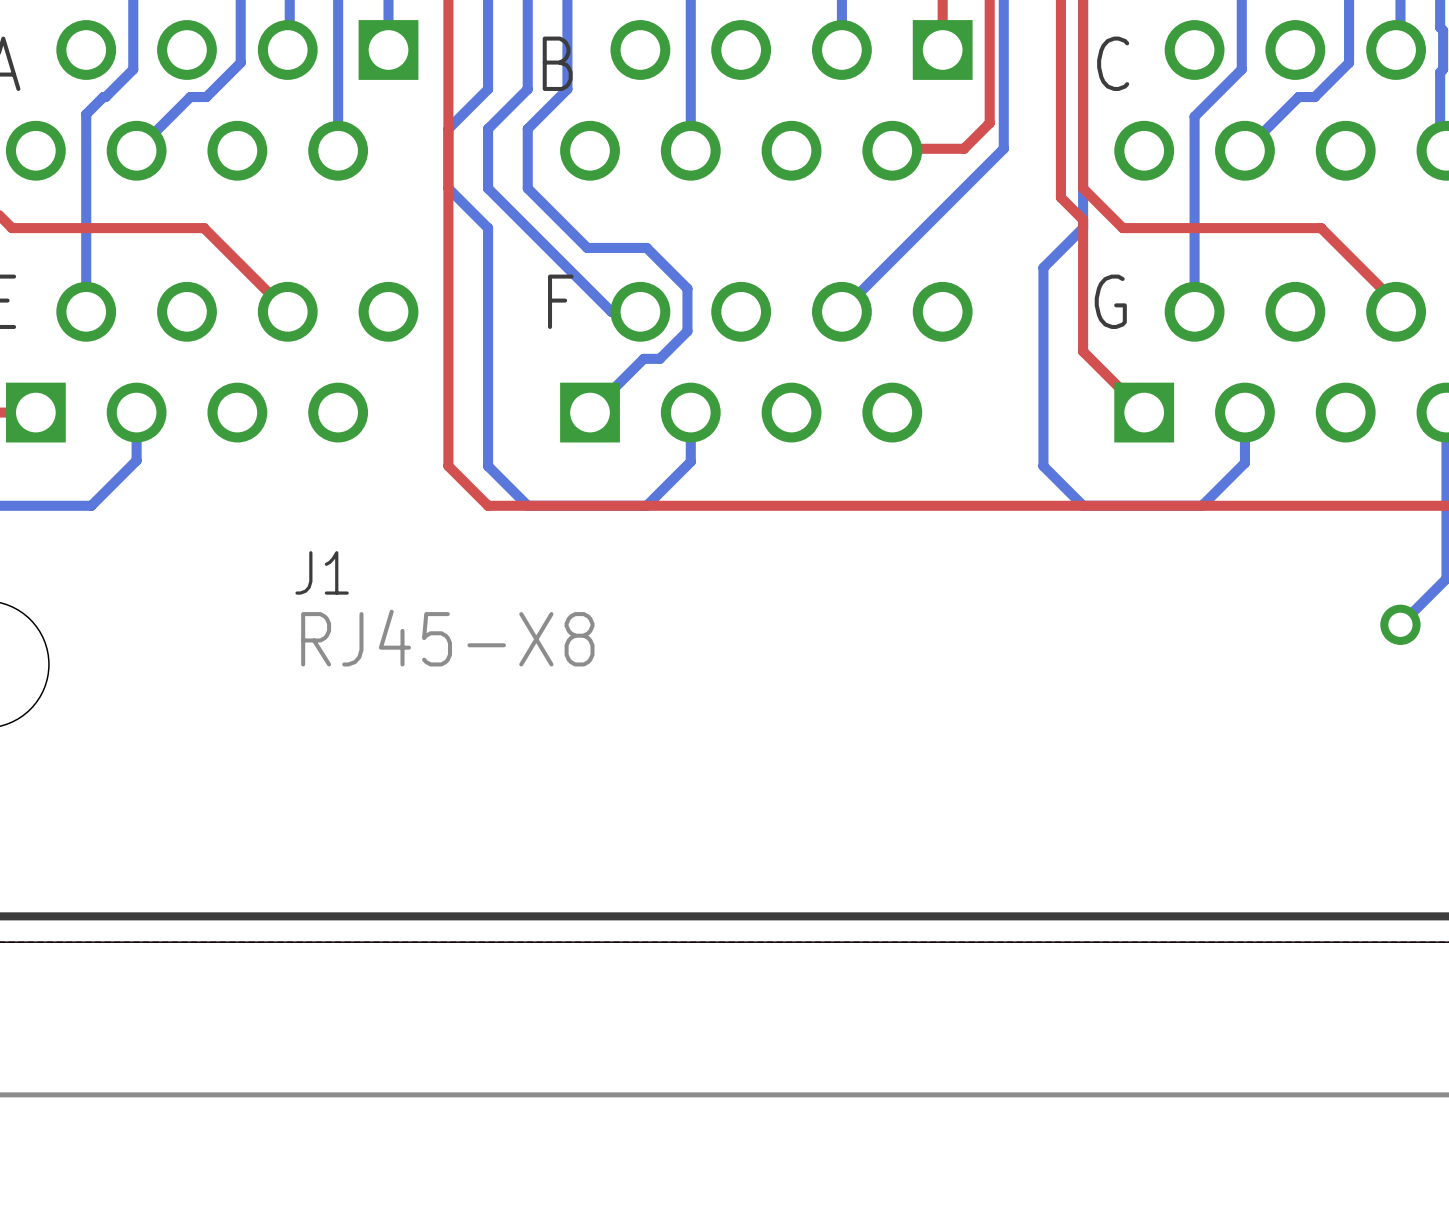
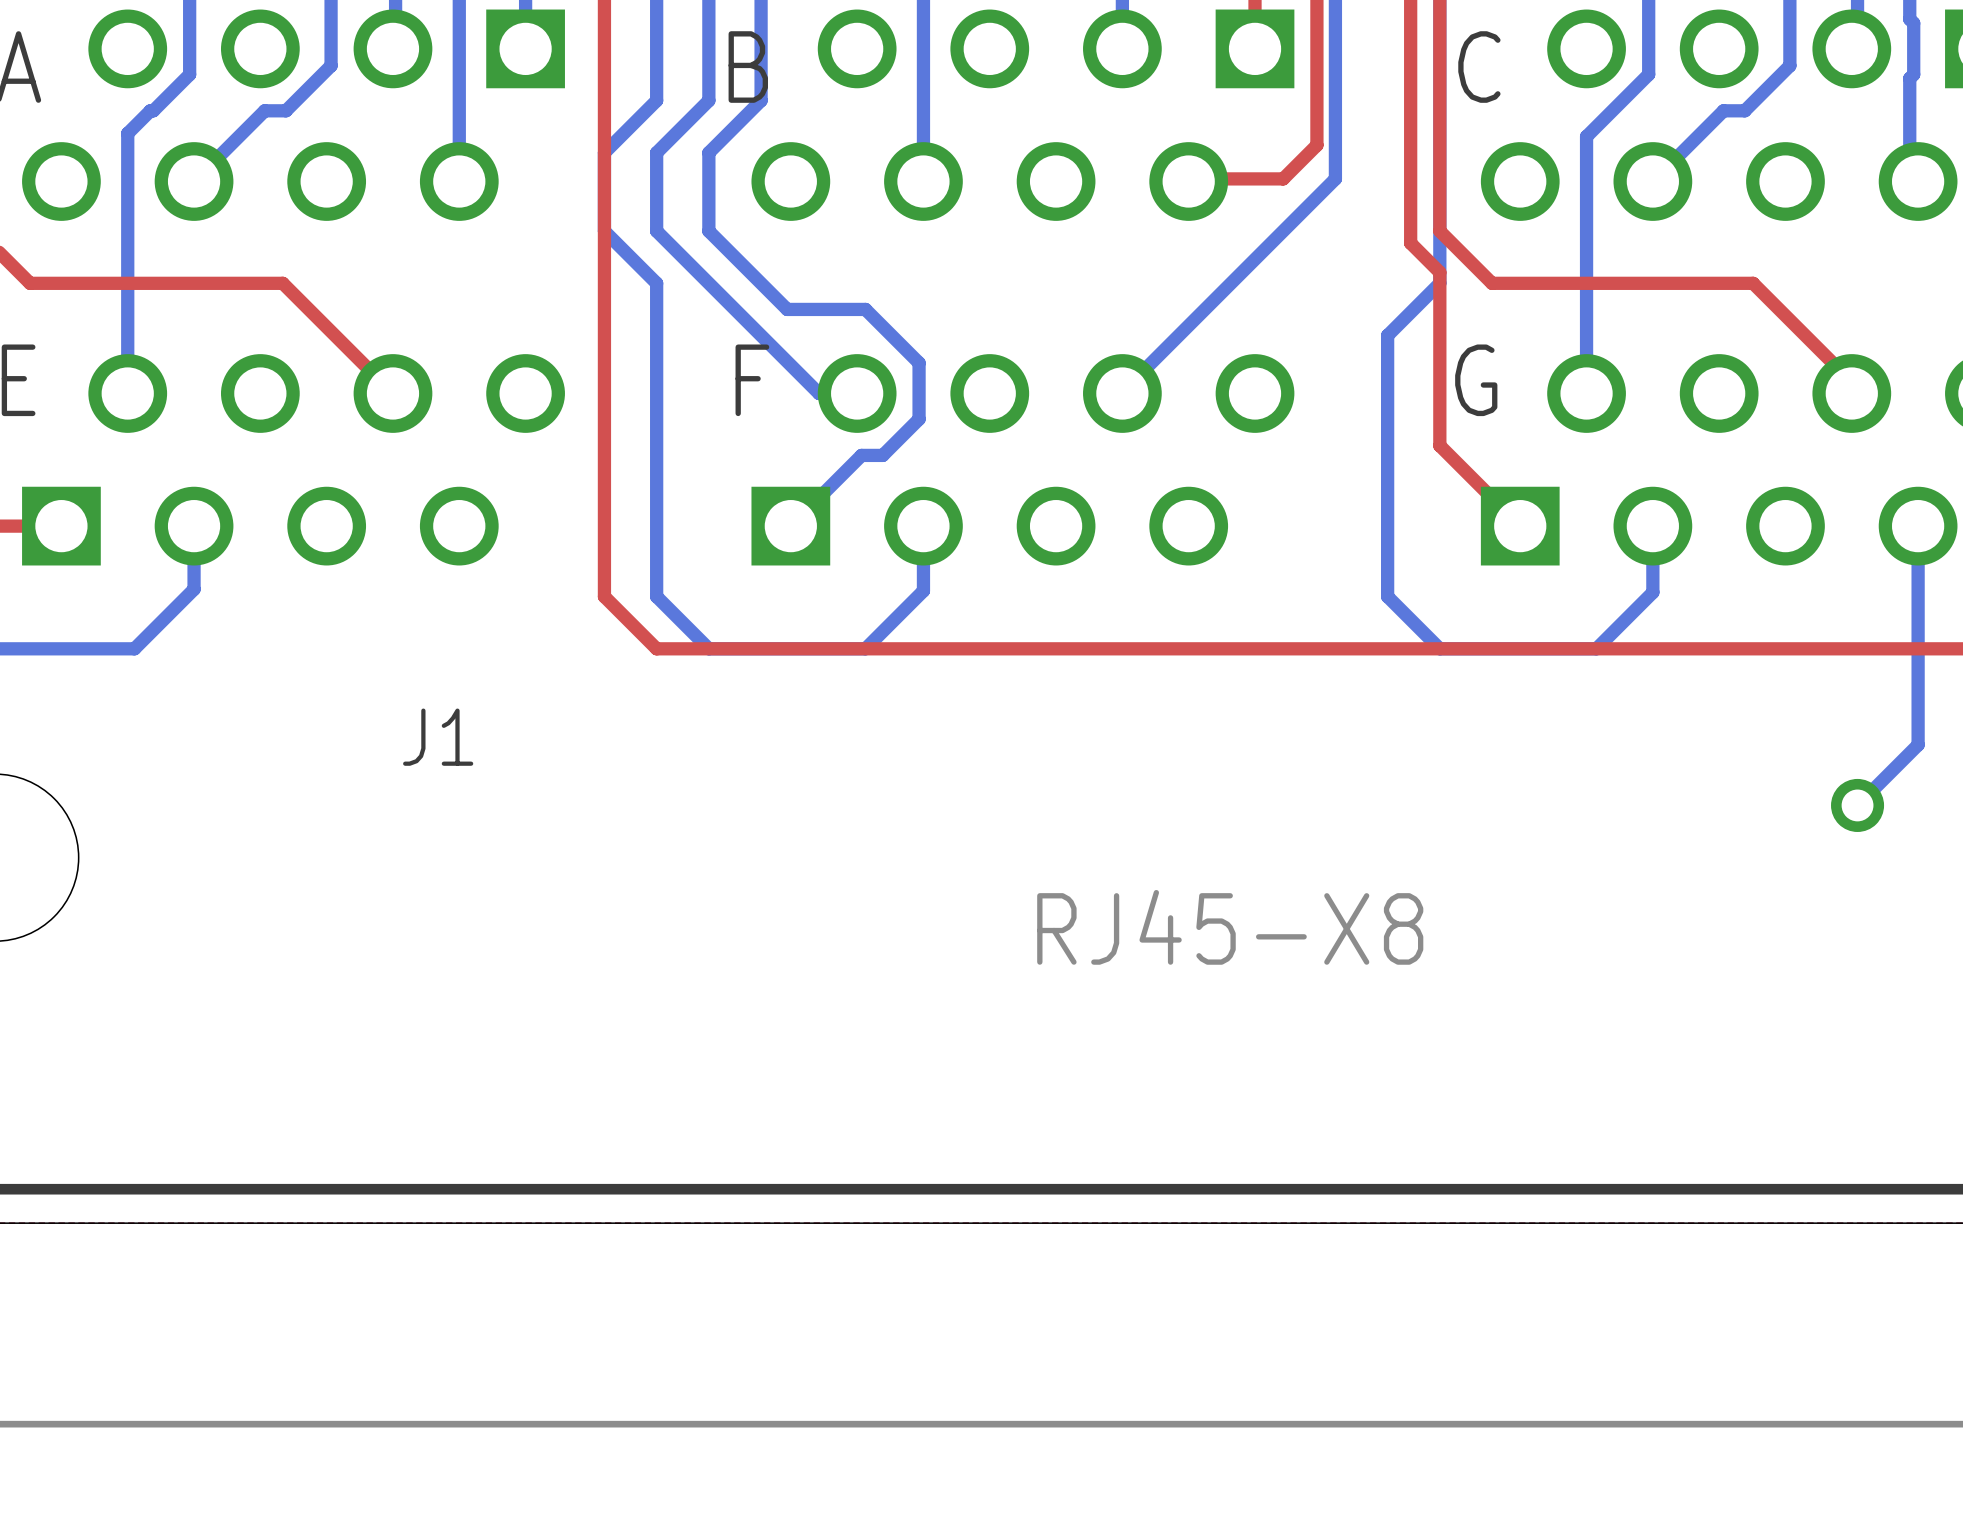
J1 value position: RJ45-X8 (447, 638) -> RJ45-X8 (1230, 927)

